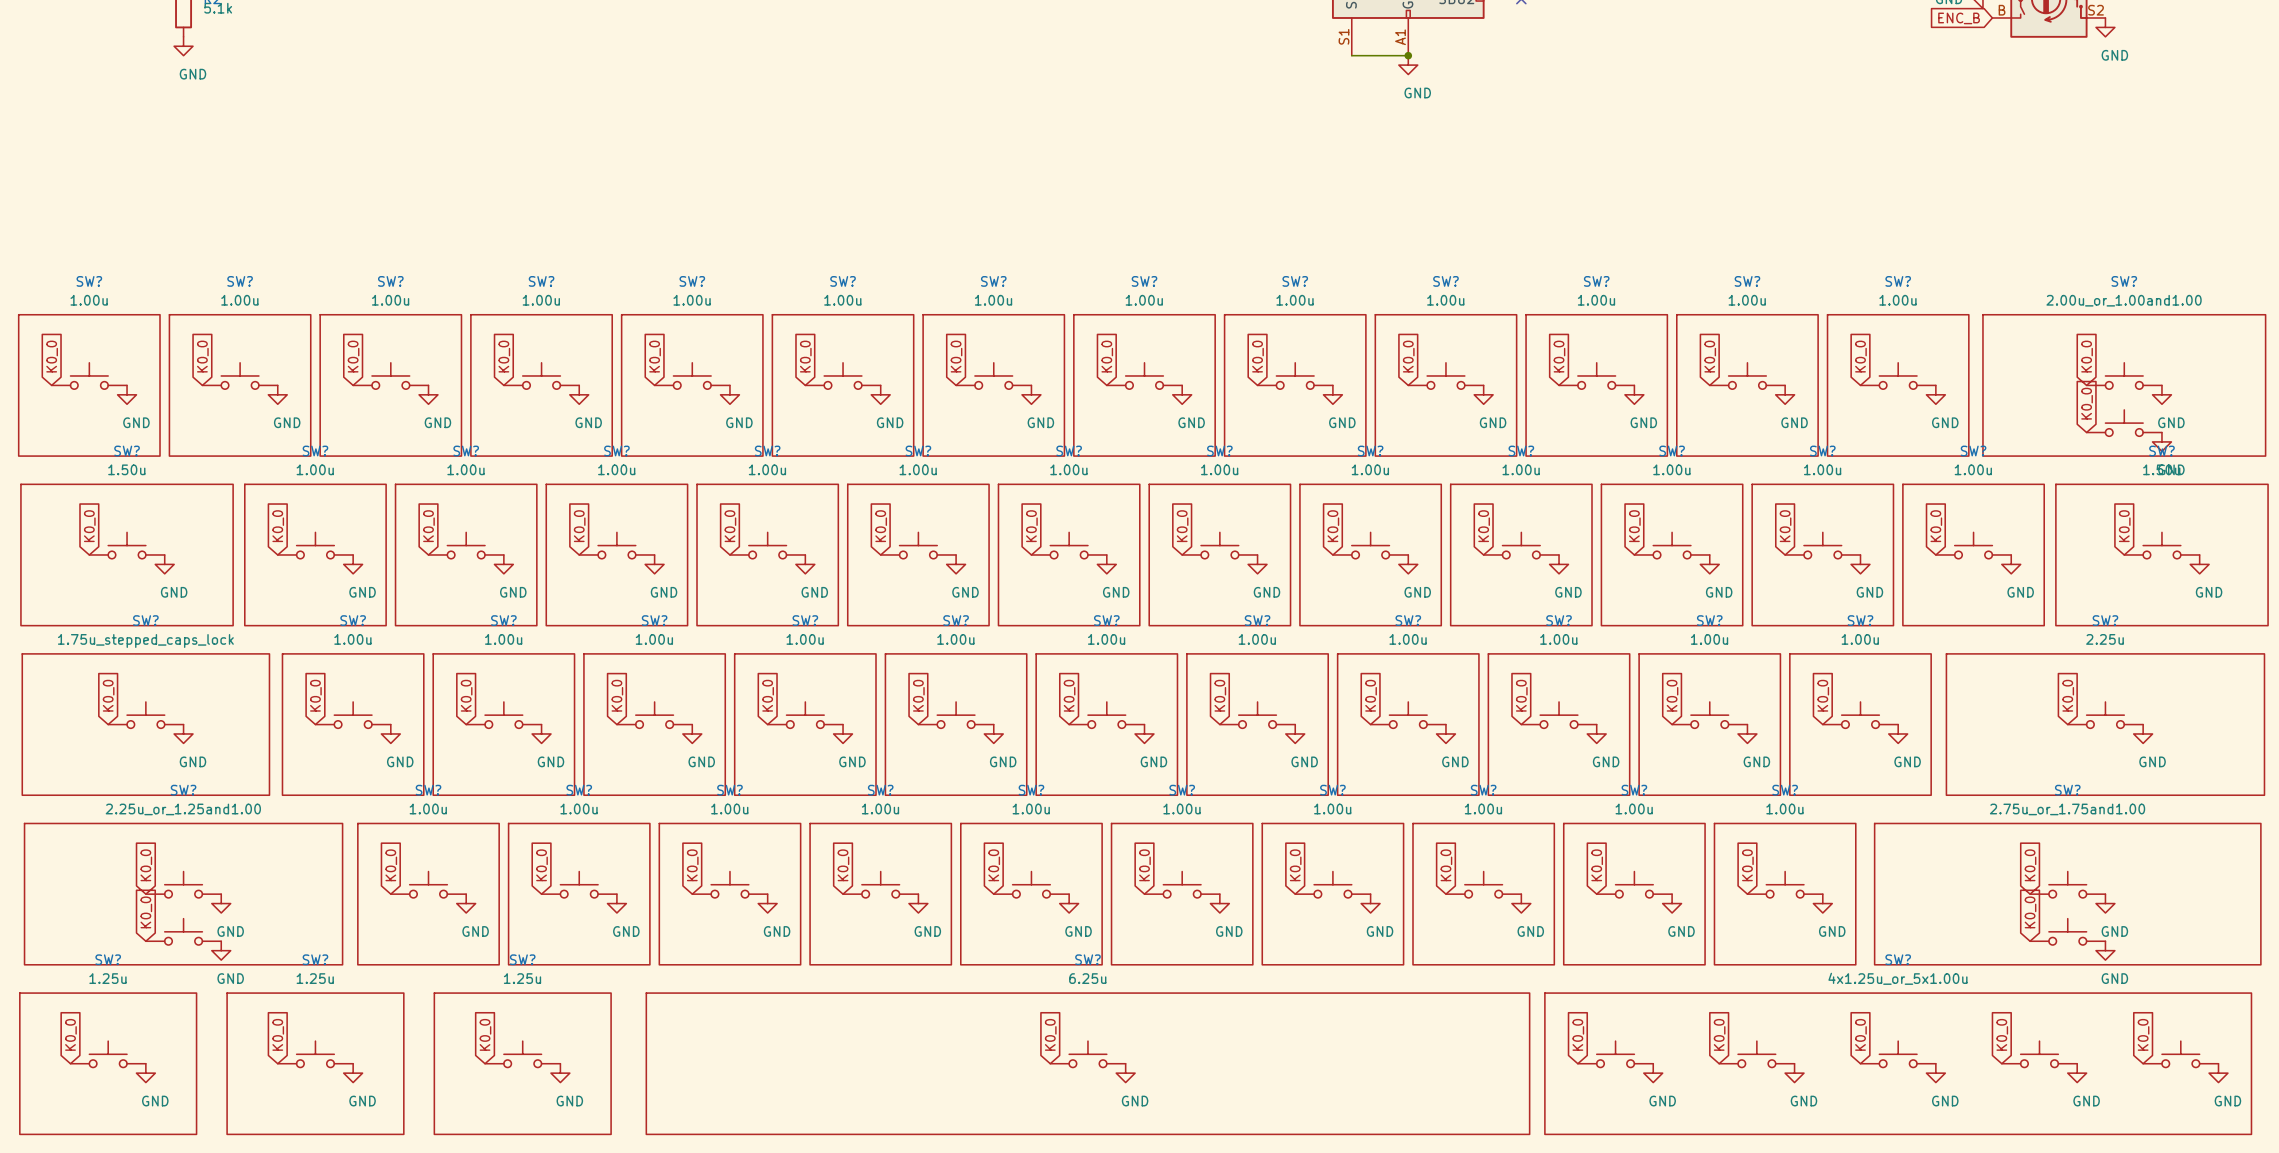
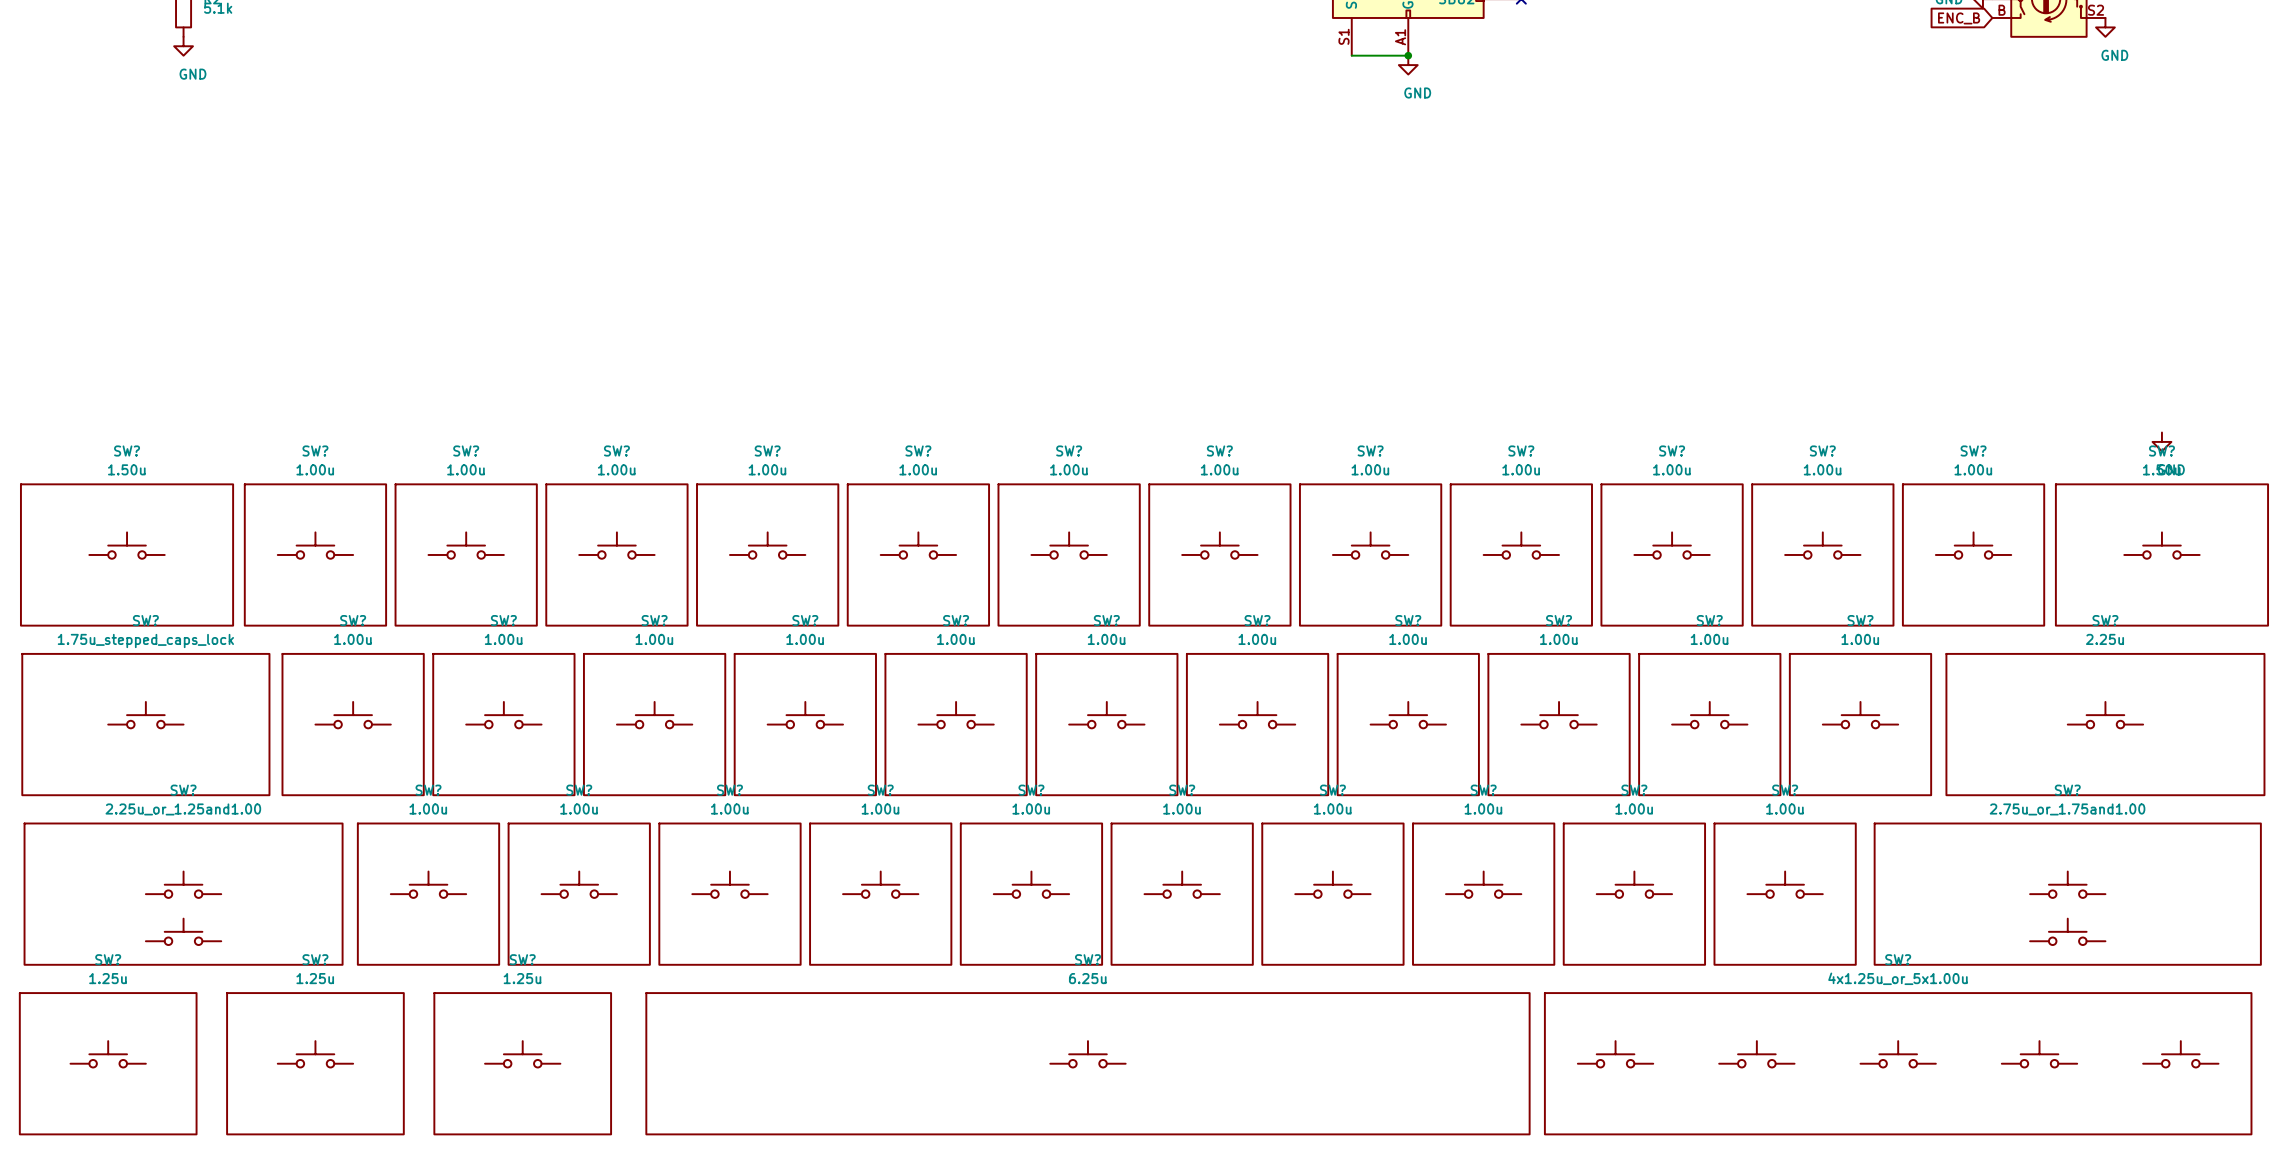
global label: K0_0 (52, 356) -> none
global label: K0_0 (202, 356) -> none
global label: K0_0 (353, 356) -> none
global label: K0_0 (504, 356) -> none
global label: K0_0 (655, 356) -> none
global label: K0_0 (805, 356) -> none
global label: K0_0 (956, 356) -> none
global label: K0_0 (1107, 356) -> none
global label: K0_0 (1258, 356) -> none
global label: K0_0 (1408, 356) -> none
global label: K0_0 (1559, 356) -> none
global label: K0_0 (1710, 356) -> none
global label: K0_0 (1860, 356) -> none
global label: K0_0 (2087, 356) -> none
SW?: 1.00u (89, 385) -> none
SW?: 1.00u (240, 385) -> none
SW?: 1.00u (390, 385) -> none
SW?: 1.00u (541, 385) -> none
SW?: 1.00u (692, 385) -> none
SW?: 1.00u (843, 385) -> none
SW?: 1.00u (993, 385) -> none
SW?: 1.00u (1144, 385) -> none
SW?: 1.00u (1295, 385) -> none
SW?: 1.00u (1445, 385) -> none
SW?: 1.00u (1596, 385) -> none
SW?: 1.00u (1747, 385) -> none
SW?: 1.00u (1898, 385) -> none
SW?: 2.00u_or_1.00and1.00 (2124, 385) -> none
power symbol: GND (127, 394) -> none
power symbol: GND (277, 394) -> none
power symbol: GND (428, 394) -> none
power symbol: GND (579, 394) -> none
power symbol: GND (729, 394) -> none
power symbol: GND (880, 394) -> none
power symbol: GND (1031, 394) -> none
power symbol: GND (1182, 394) -> none
power symbol: GND (1332, 394) -> none
power symbol: GND (1483, 394) -> none
power symbol: GND (1634, 394) -> none
power symbol: GND (1785, 394) -> none
power symbol: GND (1935, 394) -> none
power symbol: GND (2161, 394) -> none
global label: K0_0 (2087, 403) -> none
global label: K0_0 (89, 526) -> none
global label: K0_0 (278, 526) -> none
global label: K0_0 (428, 526) -> none
global label: K0_0 (579, 526) -> none
global label: K0_0 (730, 526) -> none
global label: K0_0 (881, 526) -> none
global label: K0_0 (1031, 526) -> none
global label: K0_0 (1182, 526) -> none
global label: K0_0 (1333, 526) -> none
global label: K0_0 (1484, 526) -> none
global label: K0_0 (1634, 526) -> none
global label: K0_0 (1785, 526) -> none
global label: K0_0 (1936, 526) -> none
global label: K0_0 (2124, 526) -> none
power symbol: GND (164, 564) -> none
power symbol: GND (353, 564) -> none
power symbol: GND (503, 564) -> none
power symbol: GND (654, 564) -> none
power symbol: GND (805, 564) -> none
power symbol: GND (956, 564) -> none
power symbol: GND (1106, 564) -> none
power symbol: GND (1257, 564) -> none
power symbol: GND (1408, 564) -> none
power symbol: GND (1559, 564) -> none
power symbol: GND (1709, 564) -> none
power symbol: GND (1860, 564) -> none
power symbol: GND (2011, 564) -> none
power symbol: GND (2199, 564) -> none
global label: K0_0 (108, 695) -> none
global label: K0_0 (315, 695) -> none
global label: K0_0 (466, 695) -> none
global label: K0_0 (617, 695) -> none
global label: K0_0 (768, 695) -> none
global label: K0_0 (918, 695) -> none
global label: K0_0 (1069, 695) -> none
global label: K0_0 (1220, 695) -> none
global label: K0_0 (1371, 695) -> none
global label: K0_0 (1521, 695) -> none
global label: K0_0 (1672, 695) -> none
global label: K0_0 (1823, 695) -> none
global label: K0_0 (2068, 695) -> none
power symbol: GND (183, 733) -> none
power symbol: GND (390, 733) -> none
power symbol: GND (541, 733) -> none
power symbol: GND (692, 733) -> none
power symbol: GND (843, 733) -> none
power symbol: GND (993, 733) -> none
power symbol: GND (1144, 733) -> none
power symbol: GND (1295, 733) -> none
power symbol: GND (1445, 733) -> none
power symbol: GND (1596, 733) -> none
power symbol: GND (1747, 733) -> none
power symbol: GND (1898, 733) -> none
power symbol: GND (2143, 733) -> none
global label: K0_0 (146, 865) -> none
global label: K0_0 (391, 865) -> none
global label: K0_0 (542, 865) -> none
global label: K0_0 (692, 865) -> none
global label: K0_0 (843, 865) -> none
global label: K0_0 (994, 865) -> none
global label: K0_0 (1144, 865) -> none
global label: K0_0 (1295, 865) -> none
global label: K0_0 (1446, 865) -> none
global label: K0_0 (1597, 865) -> none
global label: K0_0 (1747, 865) -> none
global label: K0_0 (2030, 865) -> none
power symbol: GND (221, 903) -> none
power symbol: GND (466, 903) -> none
power symbol: GND (616, 903) -> none
power symbol: GND (767, 903) -> none
power symbol: GND (918, 903) -> none
power symbol: GND (1069, 903) -> none
power symbol: GND (1219, 903) -> none
power symbol: GND (1370, 903) -> none
power symbol: GND (1521, 903) -> none
power symbol: GND (1672, 903) -> none
power symbol: GND (1822, 903) -> none
power symbol: GND (2105, 903) -> none
global label: K0_0 (146, 912) -> none
global label: K0_0 (2030, 912) -> none
power symbol: GND (221, 950) -> none
power symbol: GND (2105, 950) -> none
global label: K0_0 (70, 1034) -> none
global label: K0_0 (278, 1034) -> none
global label: K0_0 (485, 1034) -> none
global label: K0_0 (1050, 1034) -> none
global label: K0_0 (1578, 1034) -> none
global label: K0_0 (1719, 1034) -> none
global label: K0_0 (1860, 1034) -> none
global label: K0_0 (2002, 1034) -> none
global label: K0_0 (2143, 1034) -> none
power symbol: GND (145, 1073) -> none
power symbol: GND (353, 1073) -> none
power symbol: GND (560, 1073) -> none
power symbol: GND (1125, 1073) -> none
power symbol: GND (1653, 1073) -> none
power symbol: GND (1794, 1073) -> none
power symbol: GND (1935, 1073) -> none
power symbol: GND (2077, 1073) -> none
power symbol: GND (2218, 1073) -> none

